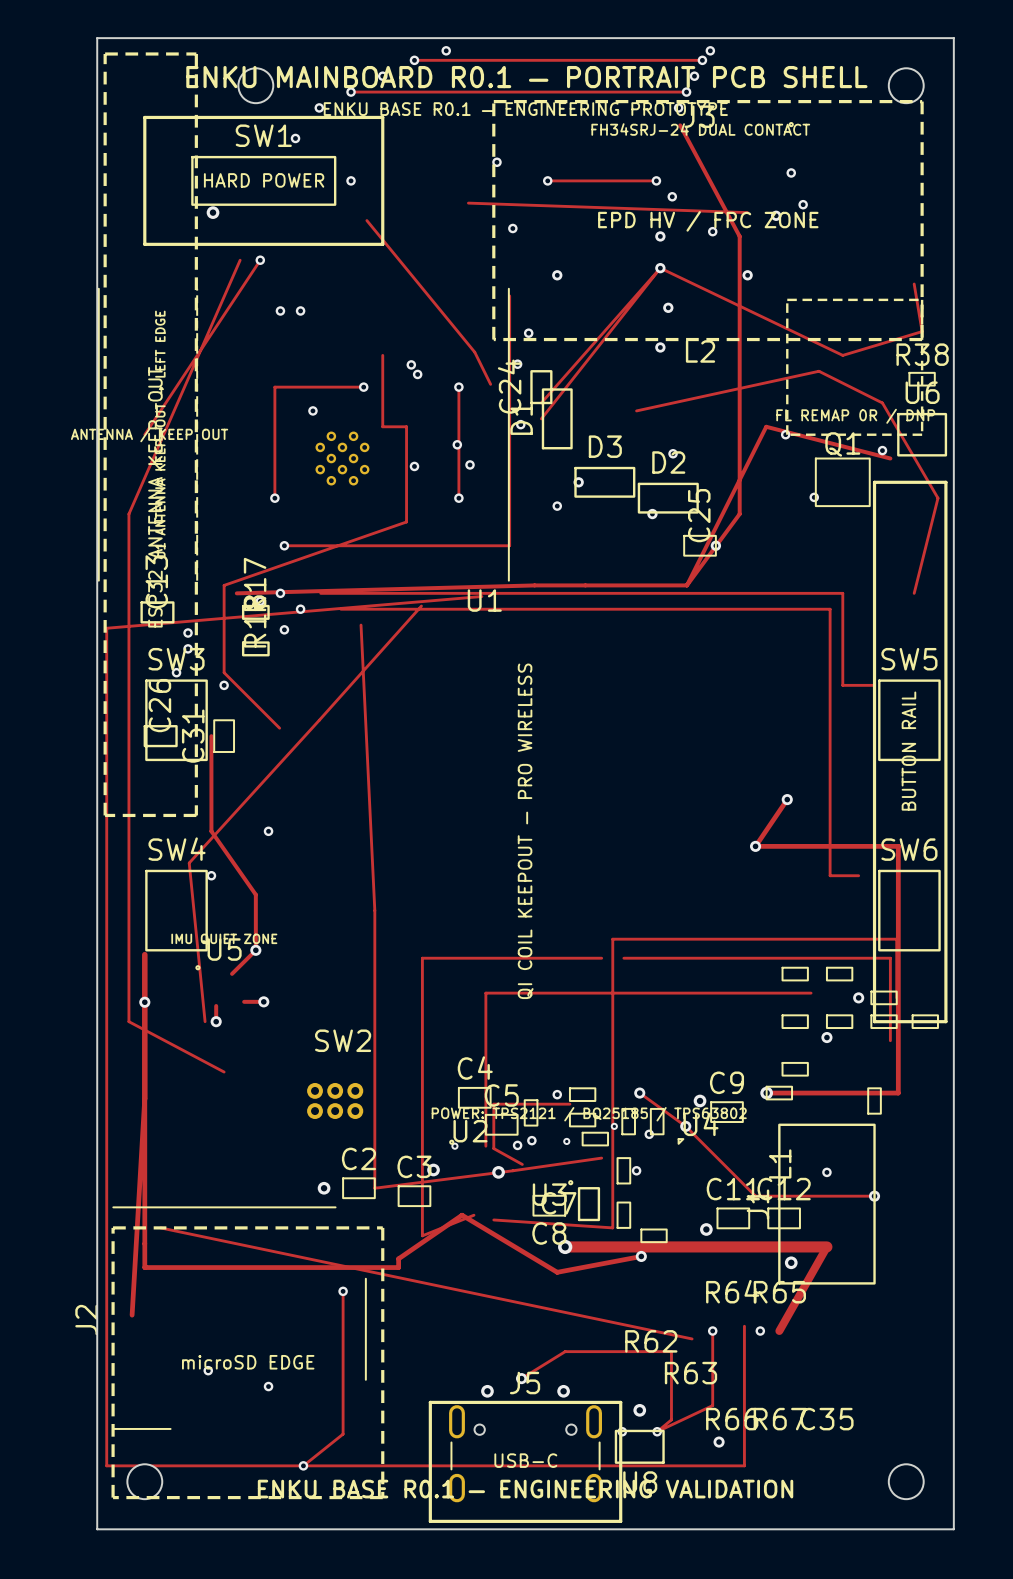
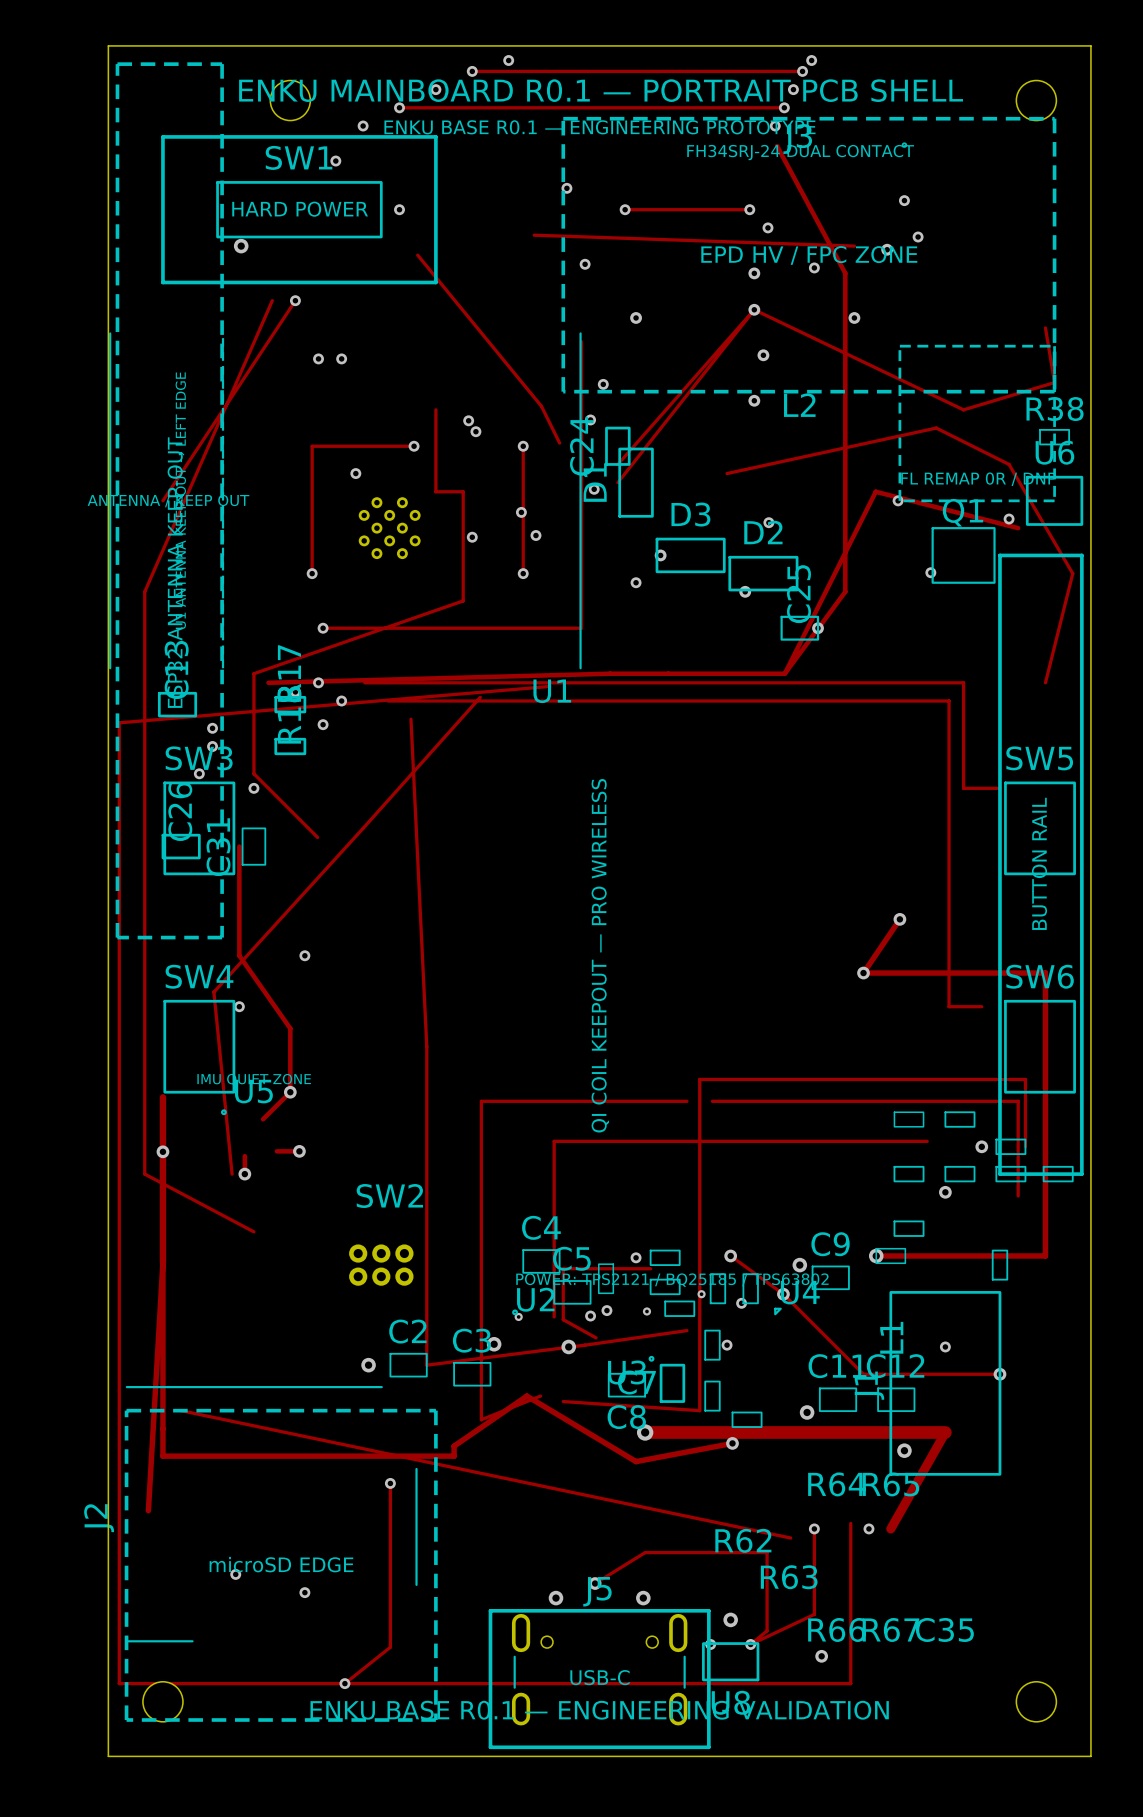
track: (898, 846) (898, 1093) -> (1027, 973) (1045, 973) (1045, 1255) (1027, 1255)

